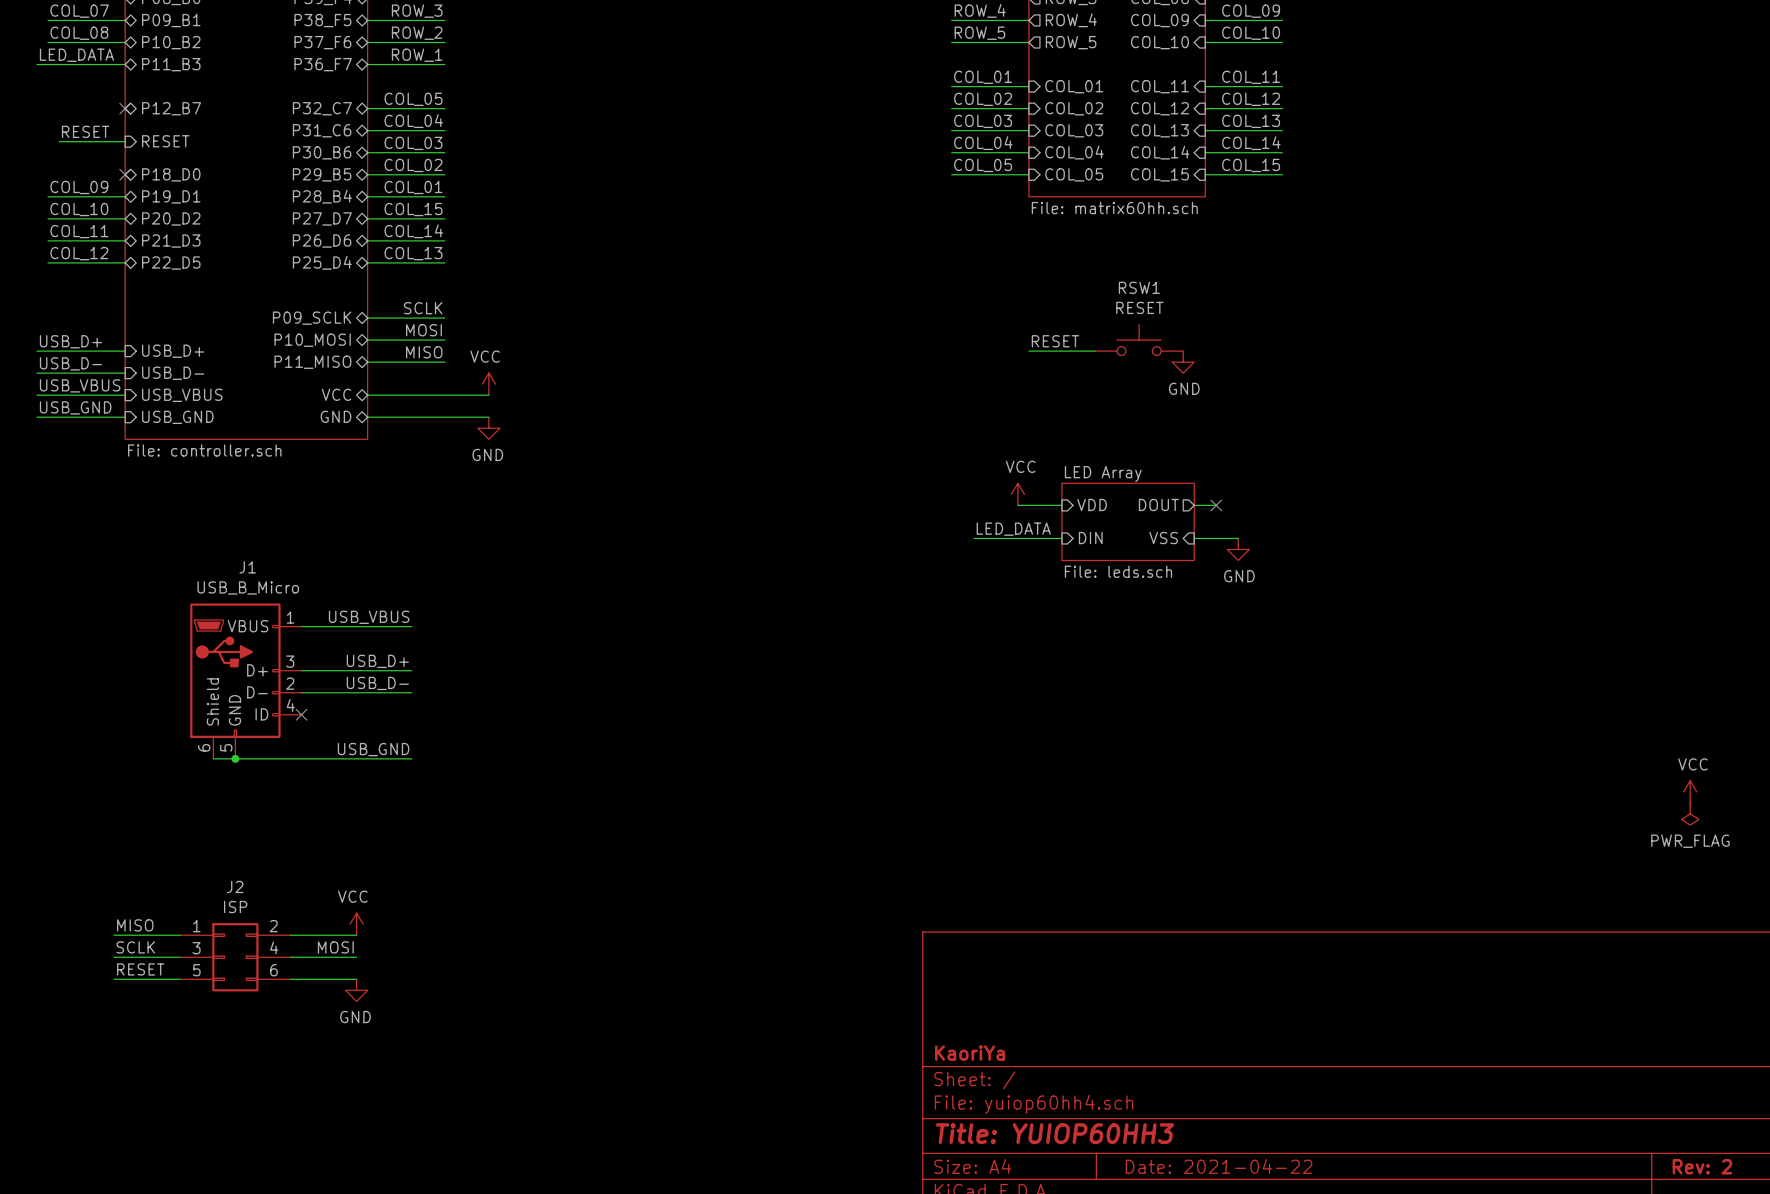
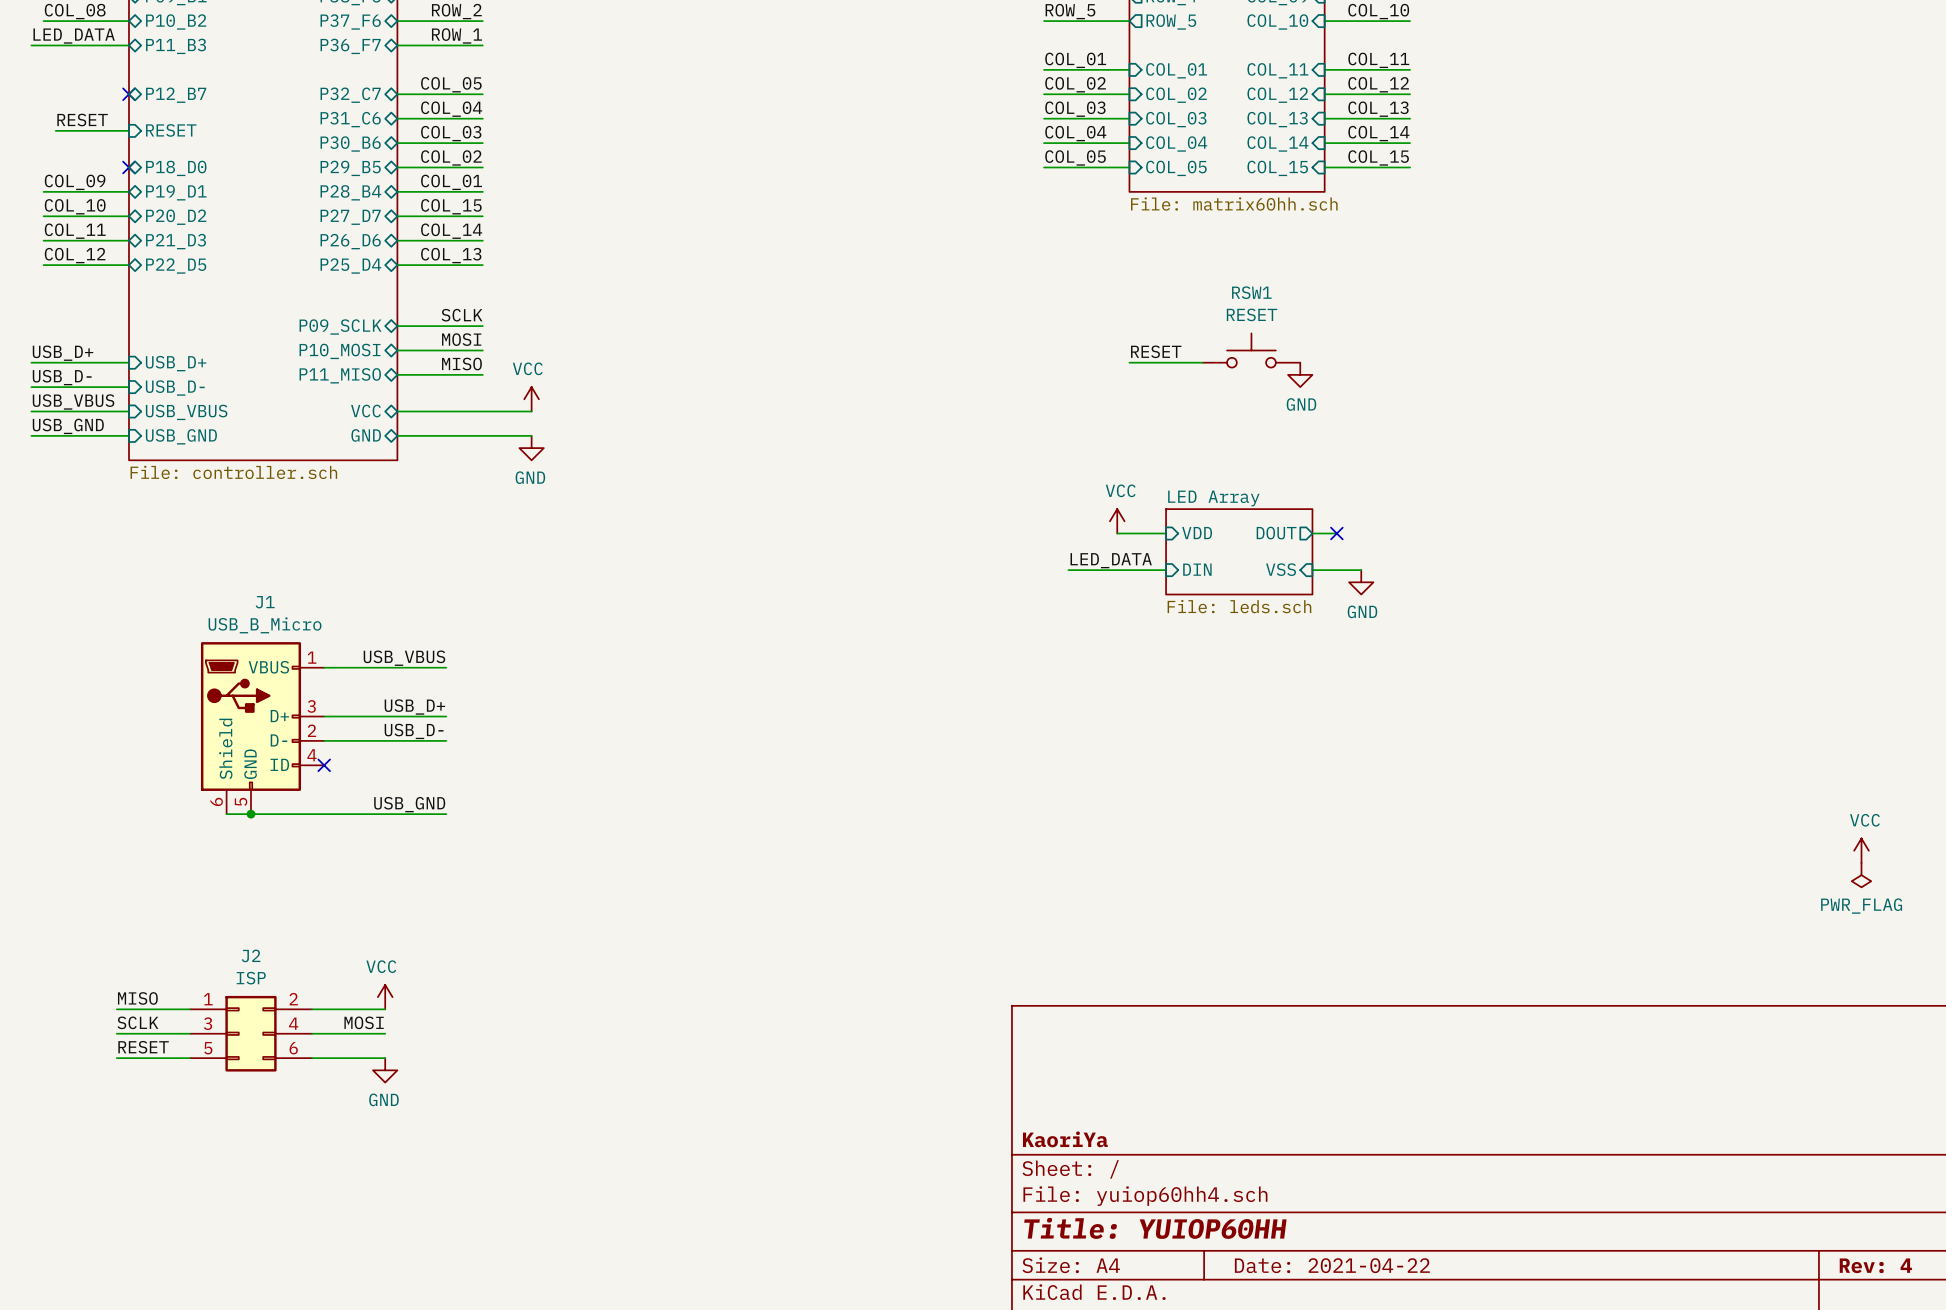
title block: Title: YUIOP60HH3 (1054, 1133) -> Title: YUIOP60HH (1155, 1228)
title block: Rev: 2 (1702, 1166) -> Rev: 4 (1875, 1265)

